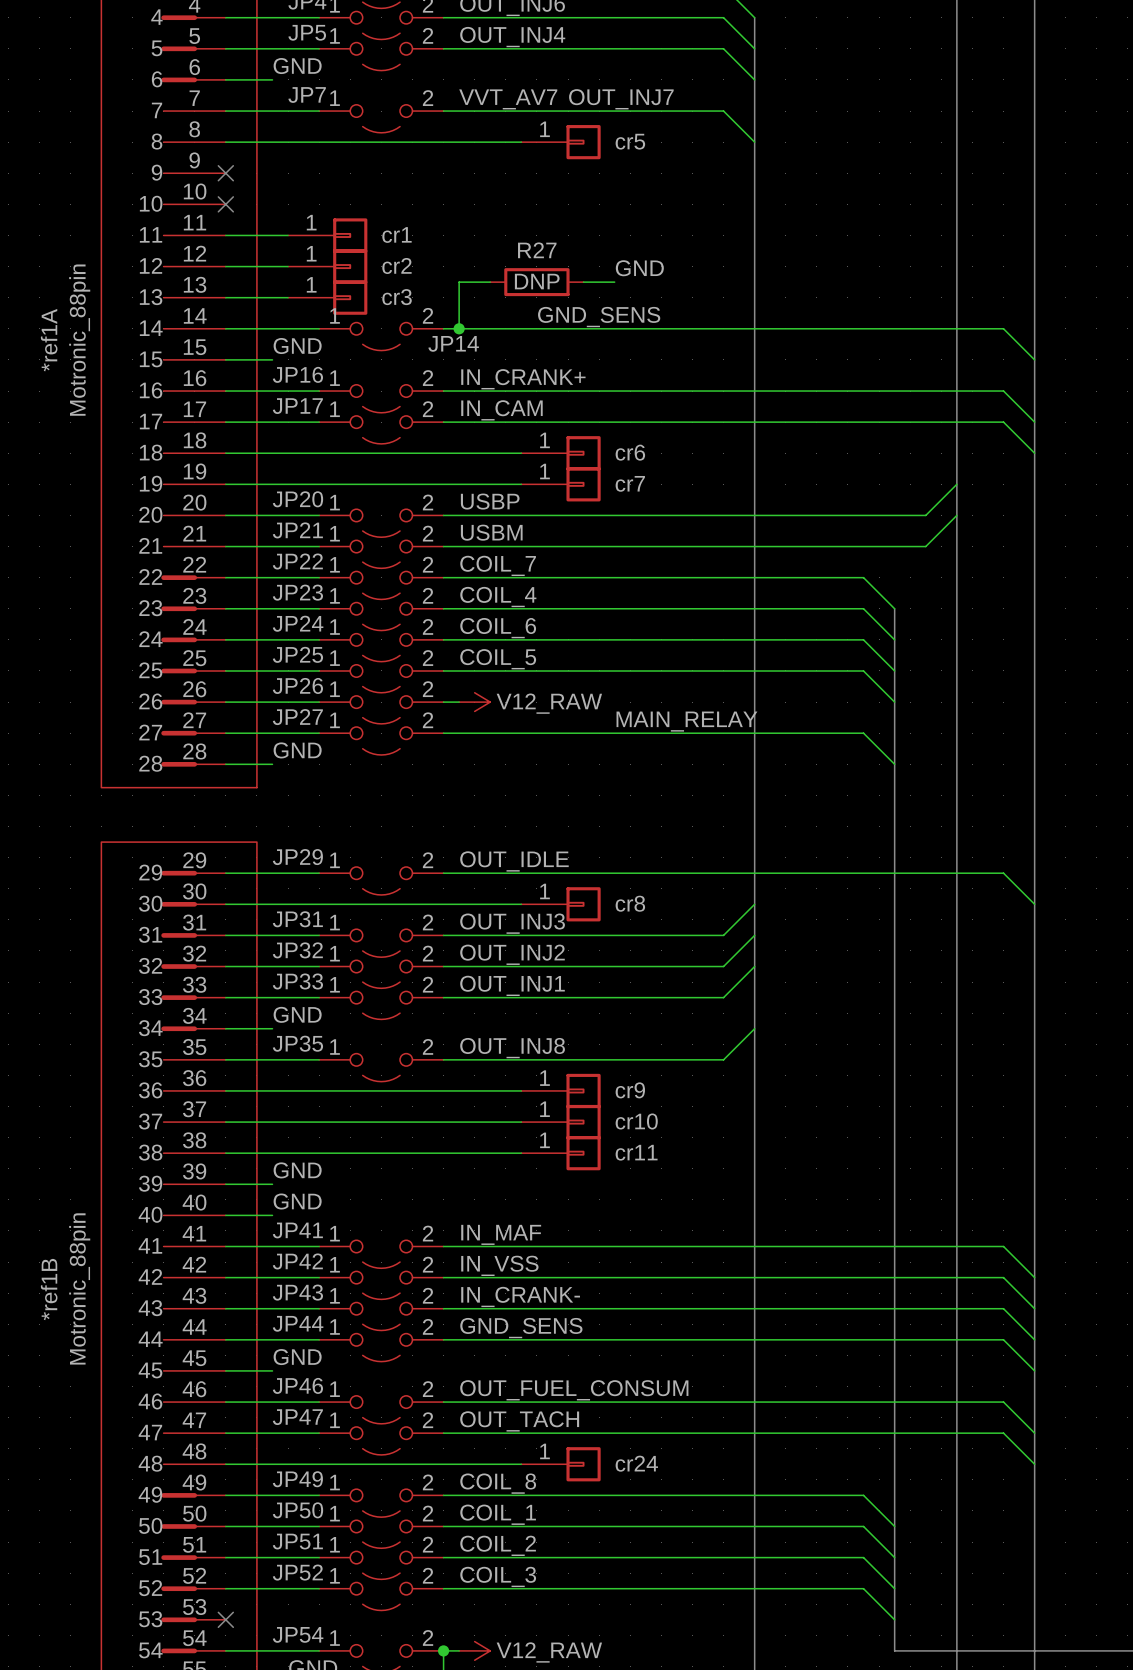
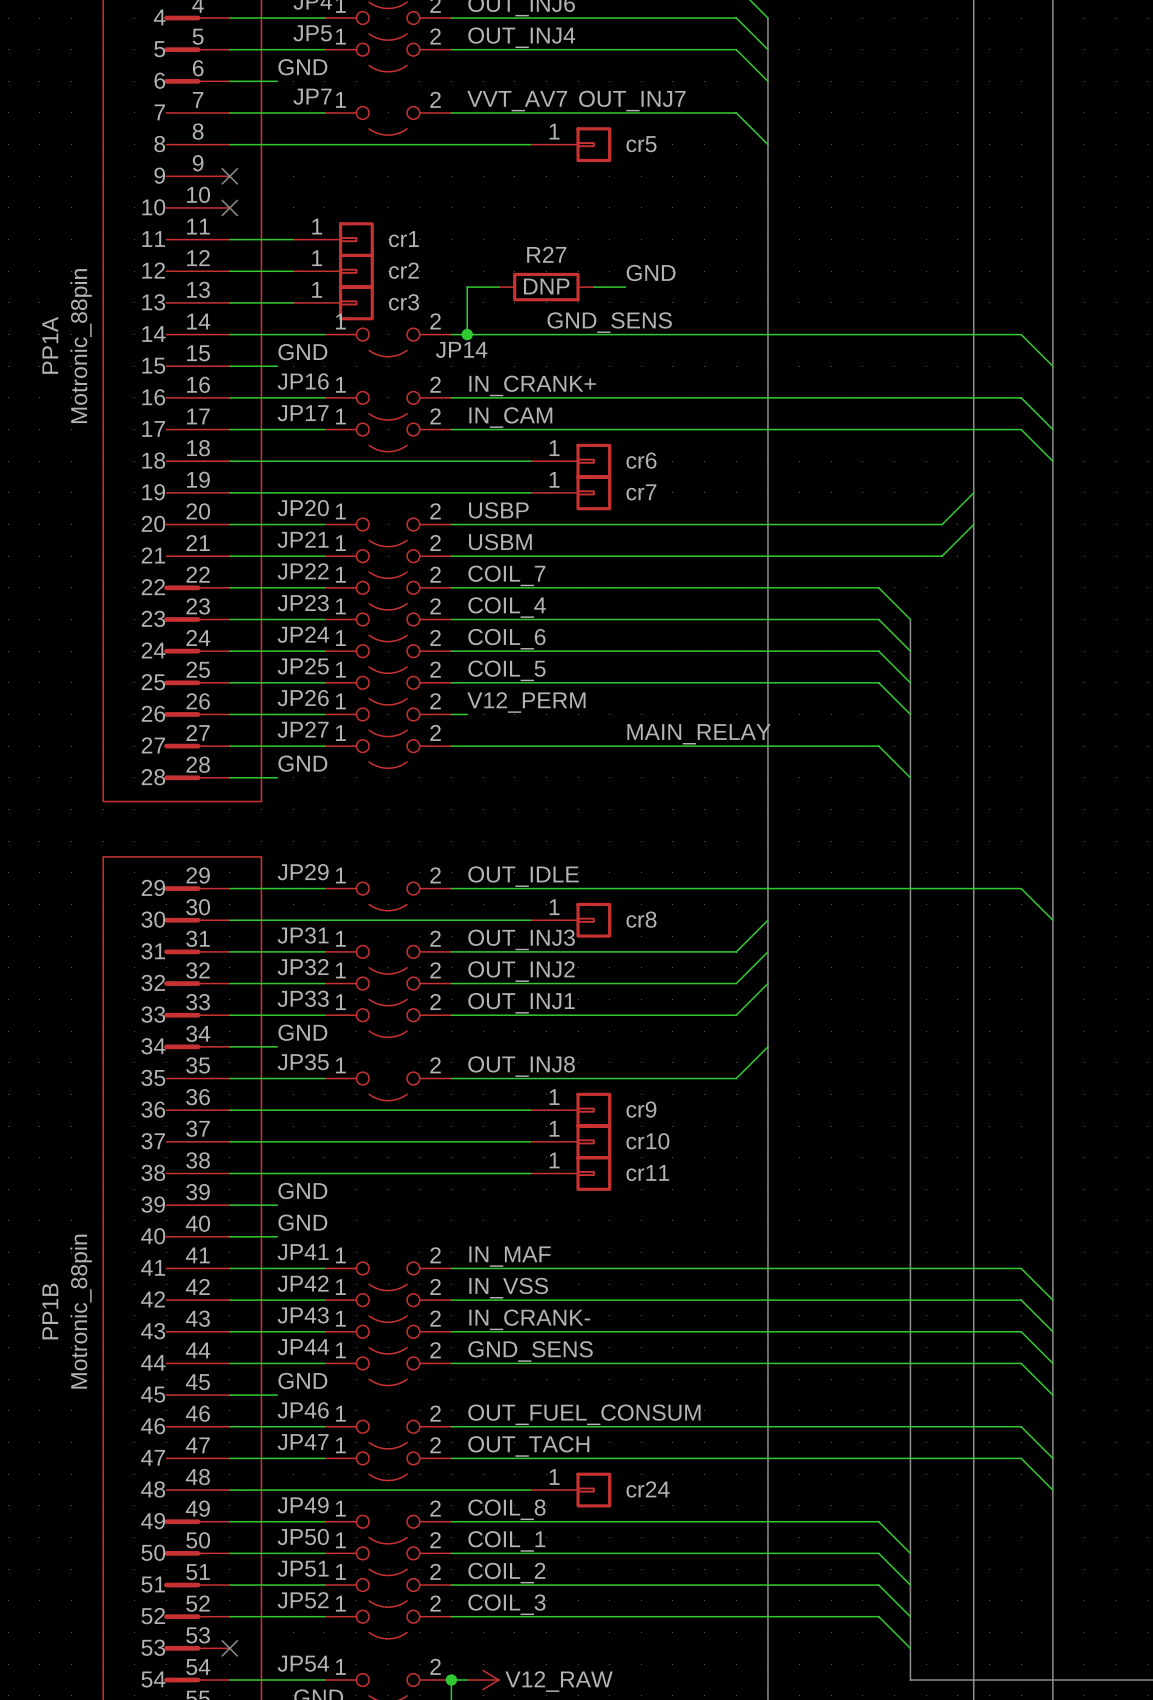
*ref1A name: *ref1A (49, 340) -> PP1A (50, 345)
label: none -> V12_PERM (526, 702)
power symbol: V12_RAW (474, 702) -> none
*ref1B name: *ref1B (49, 1289) -> PP1B (50, 1311)

